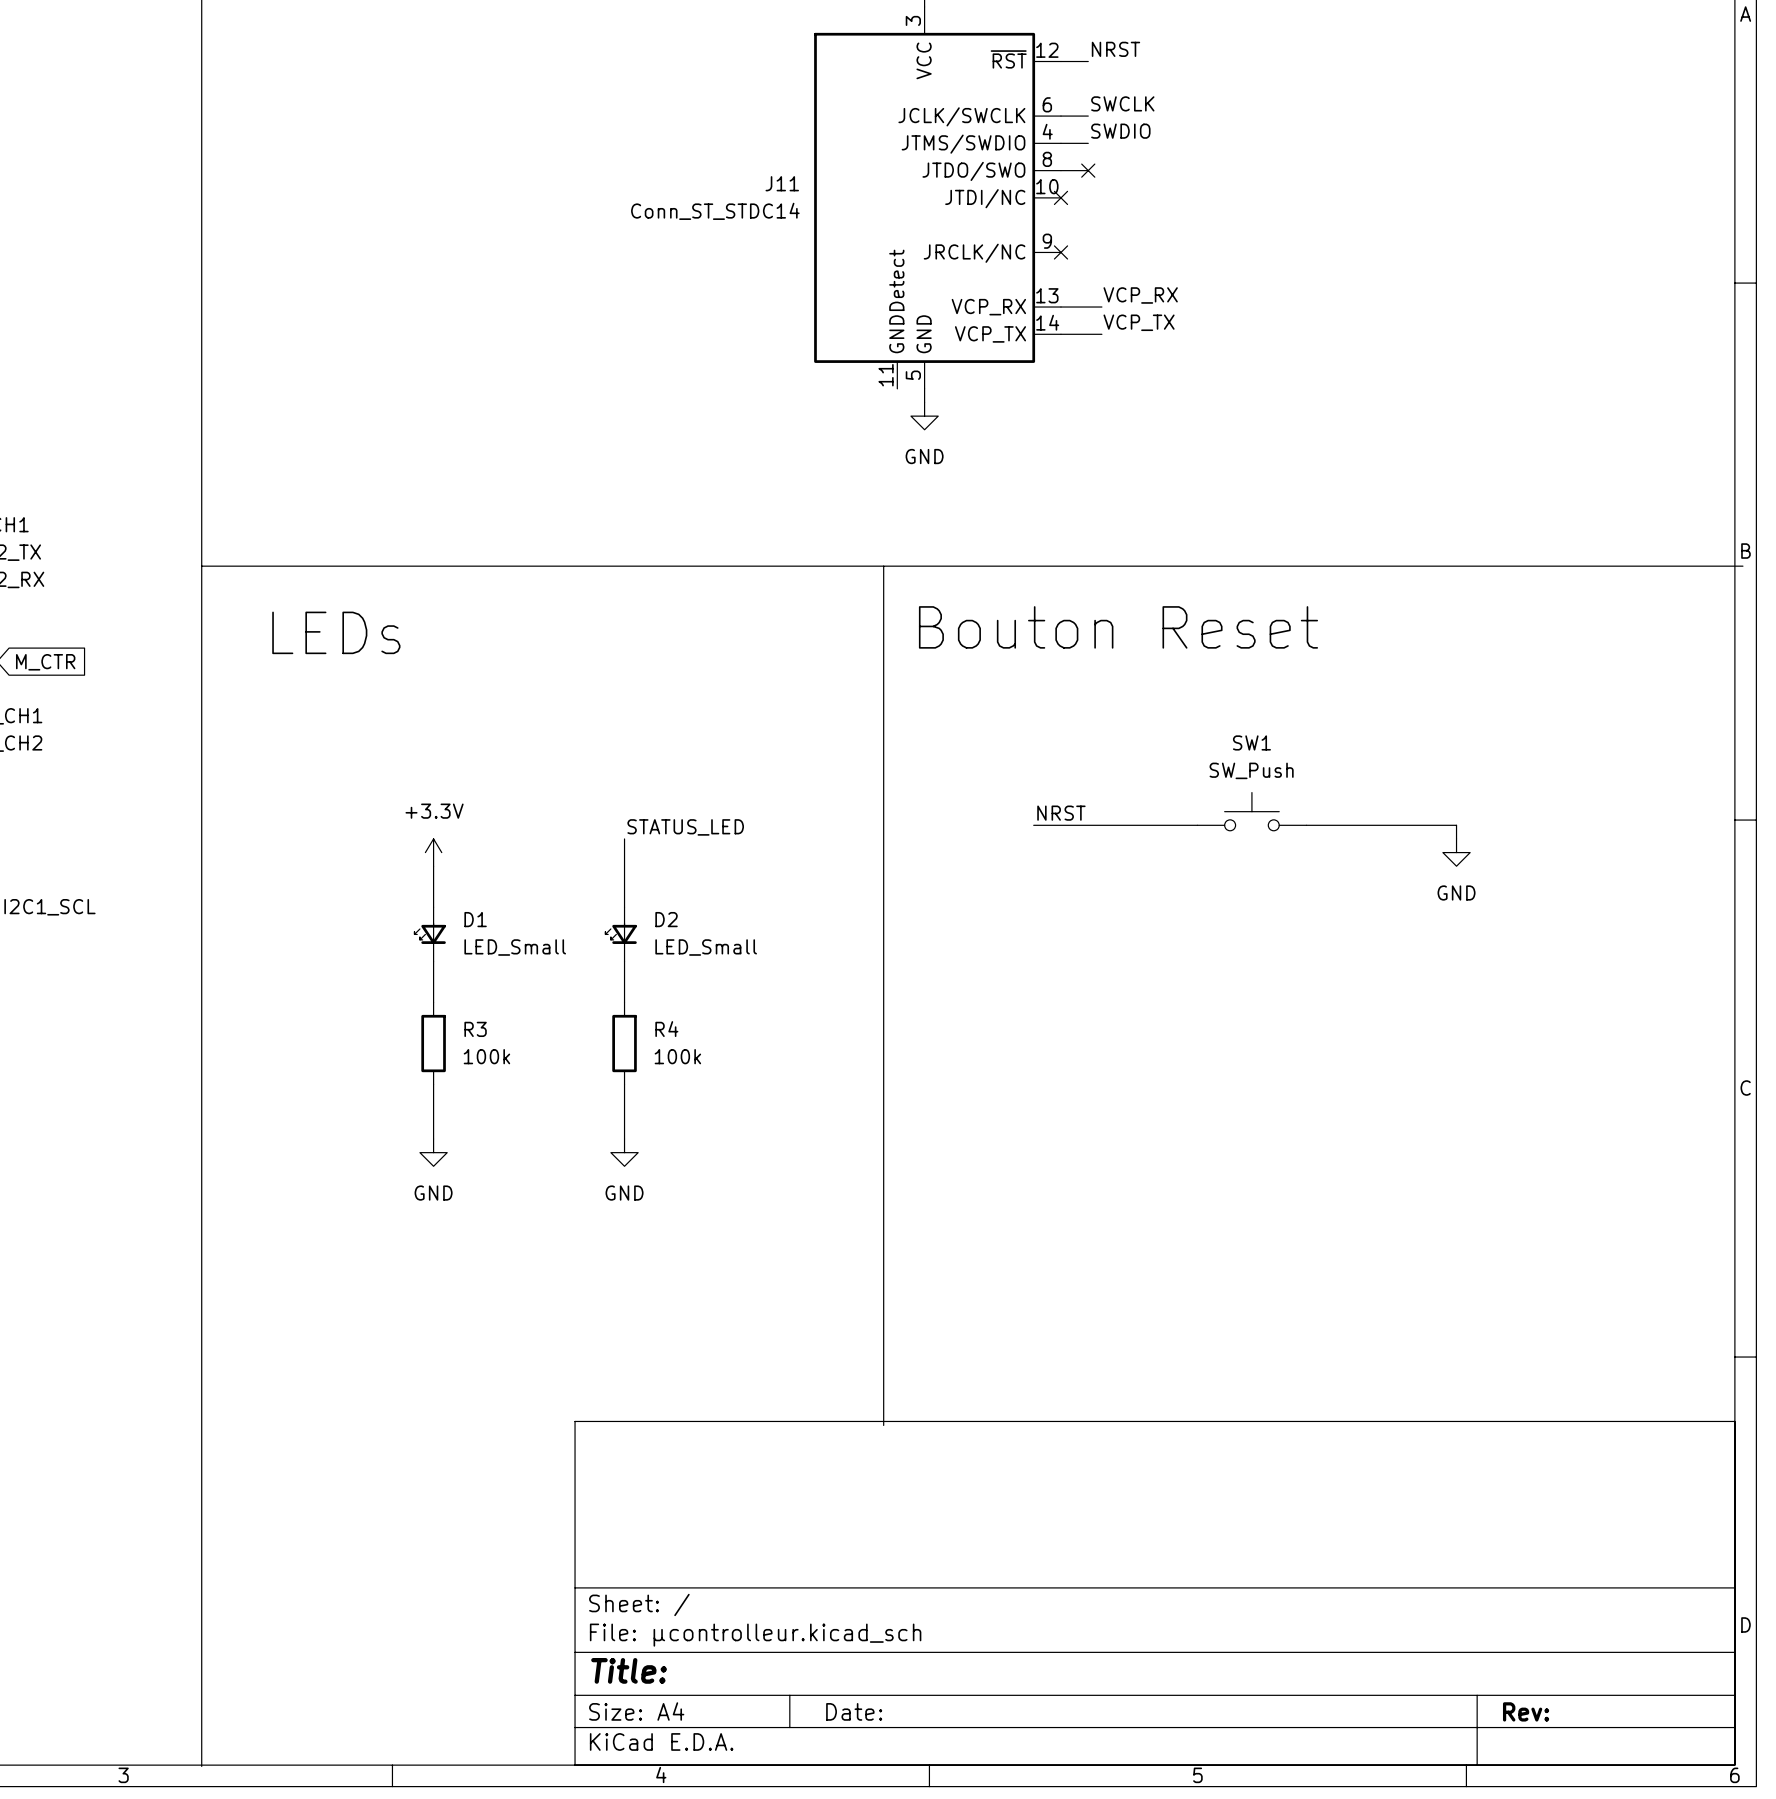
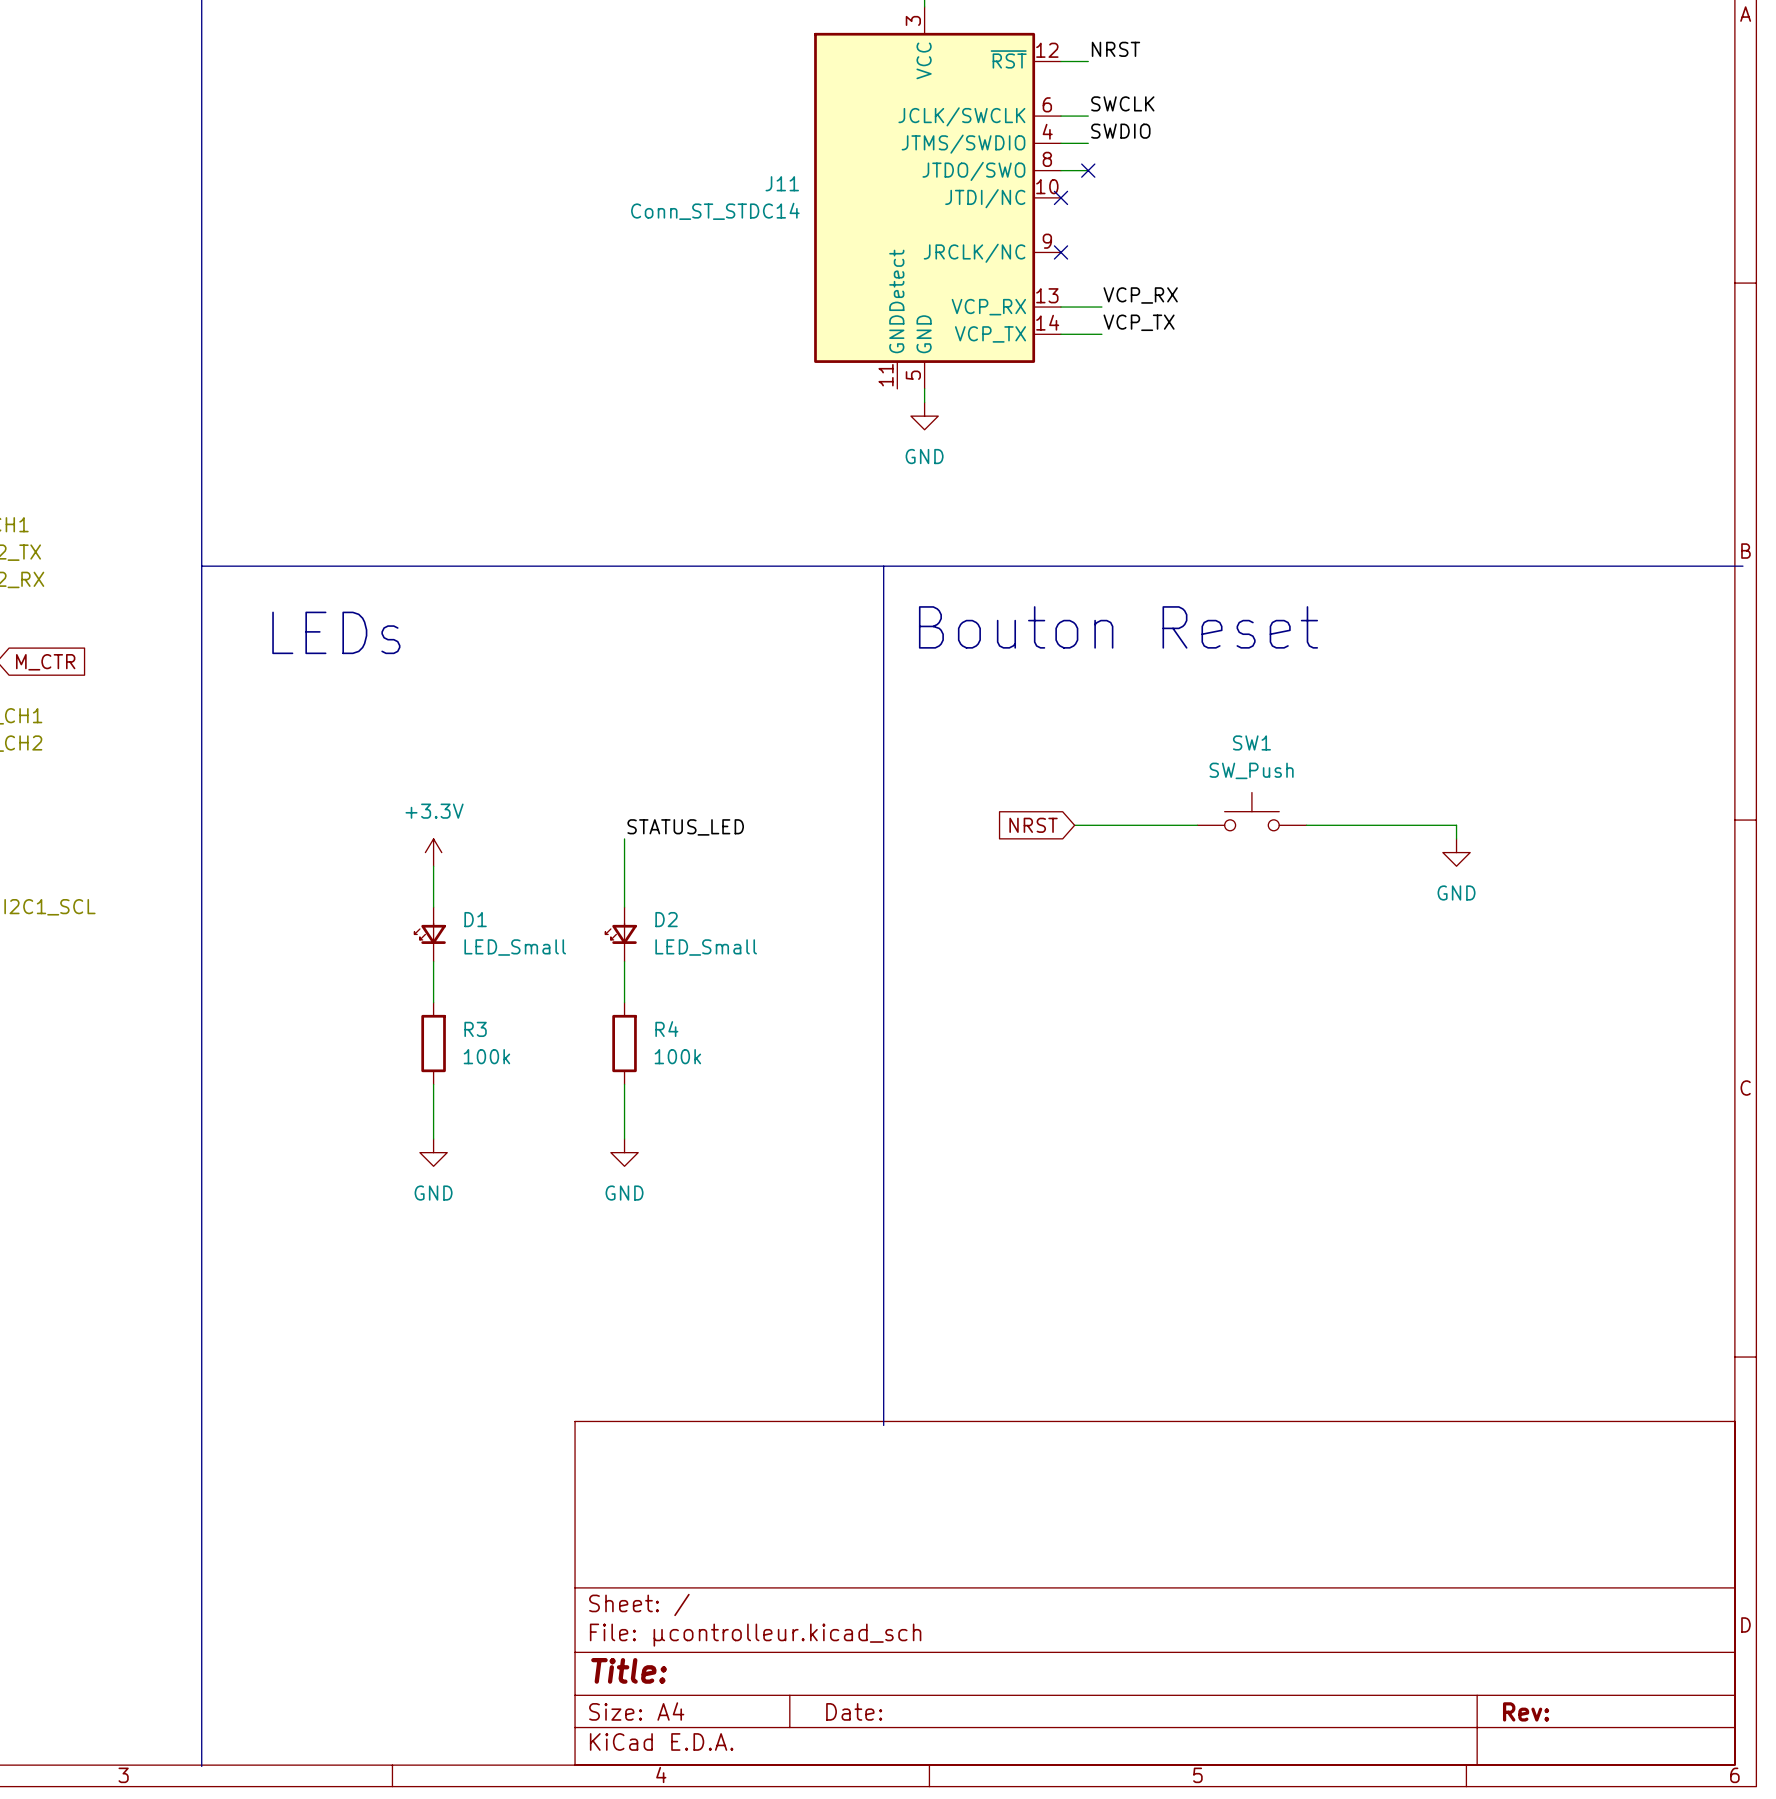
label: NRST (1061, 813) -> none
wire: (1033, 825) (1074, 825) -> none
global label: none -> NRST (1033, 825)

